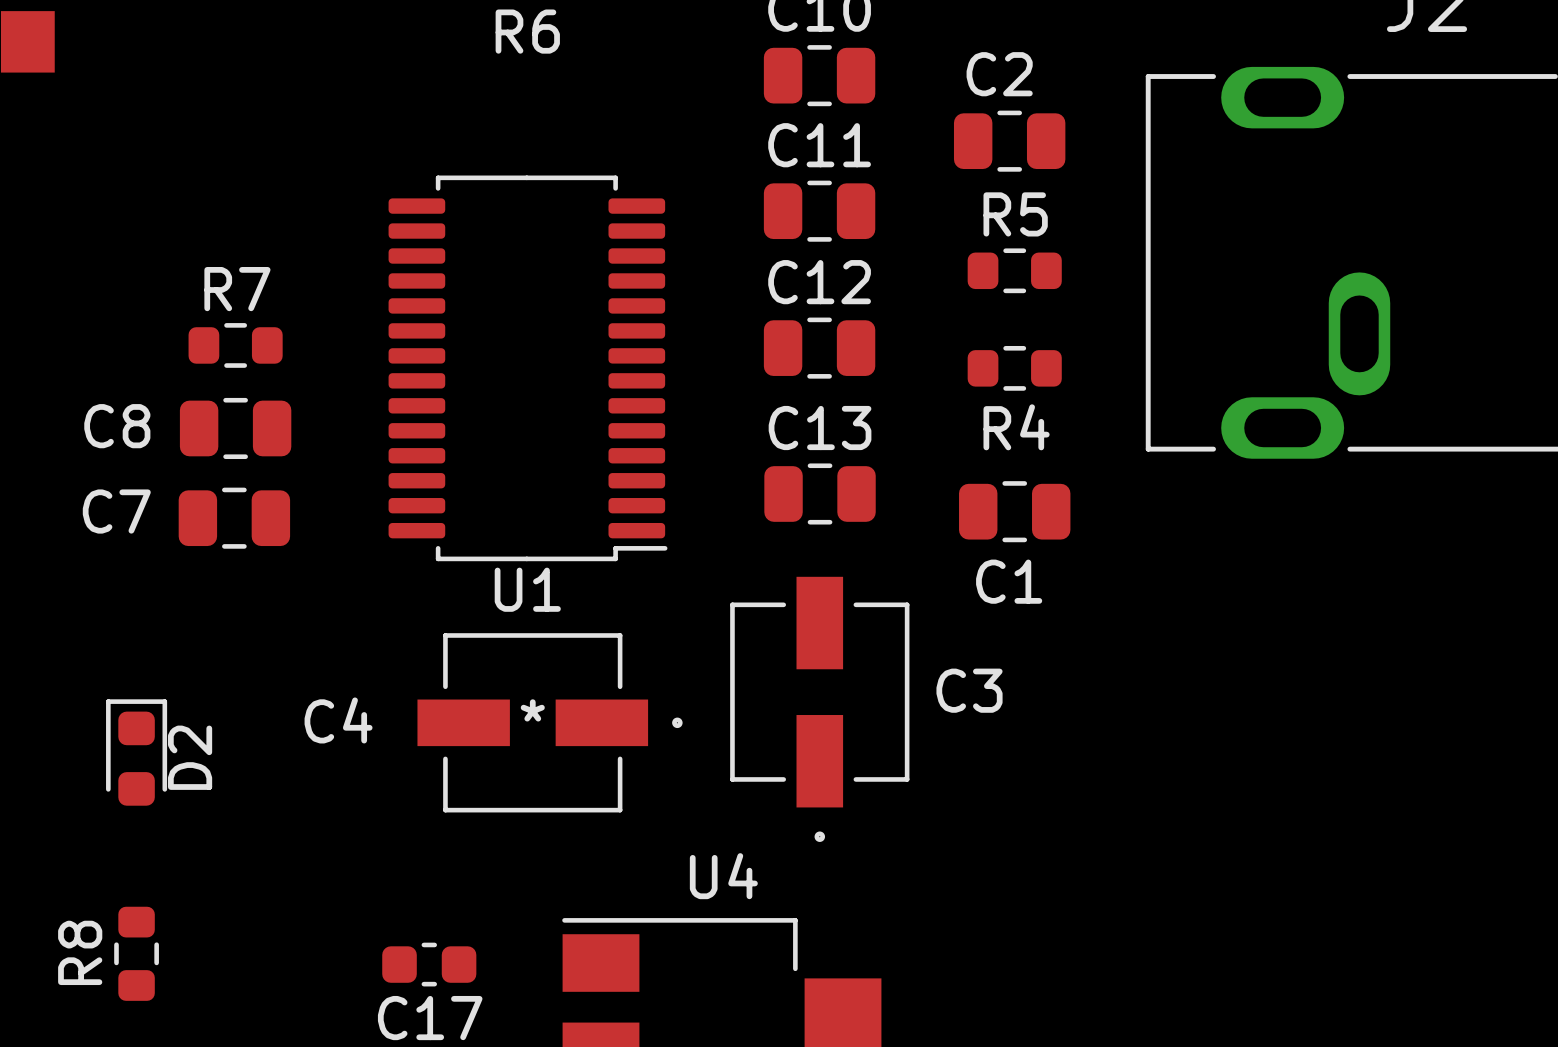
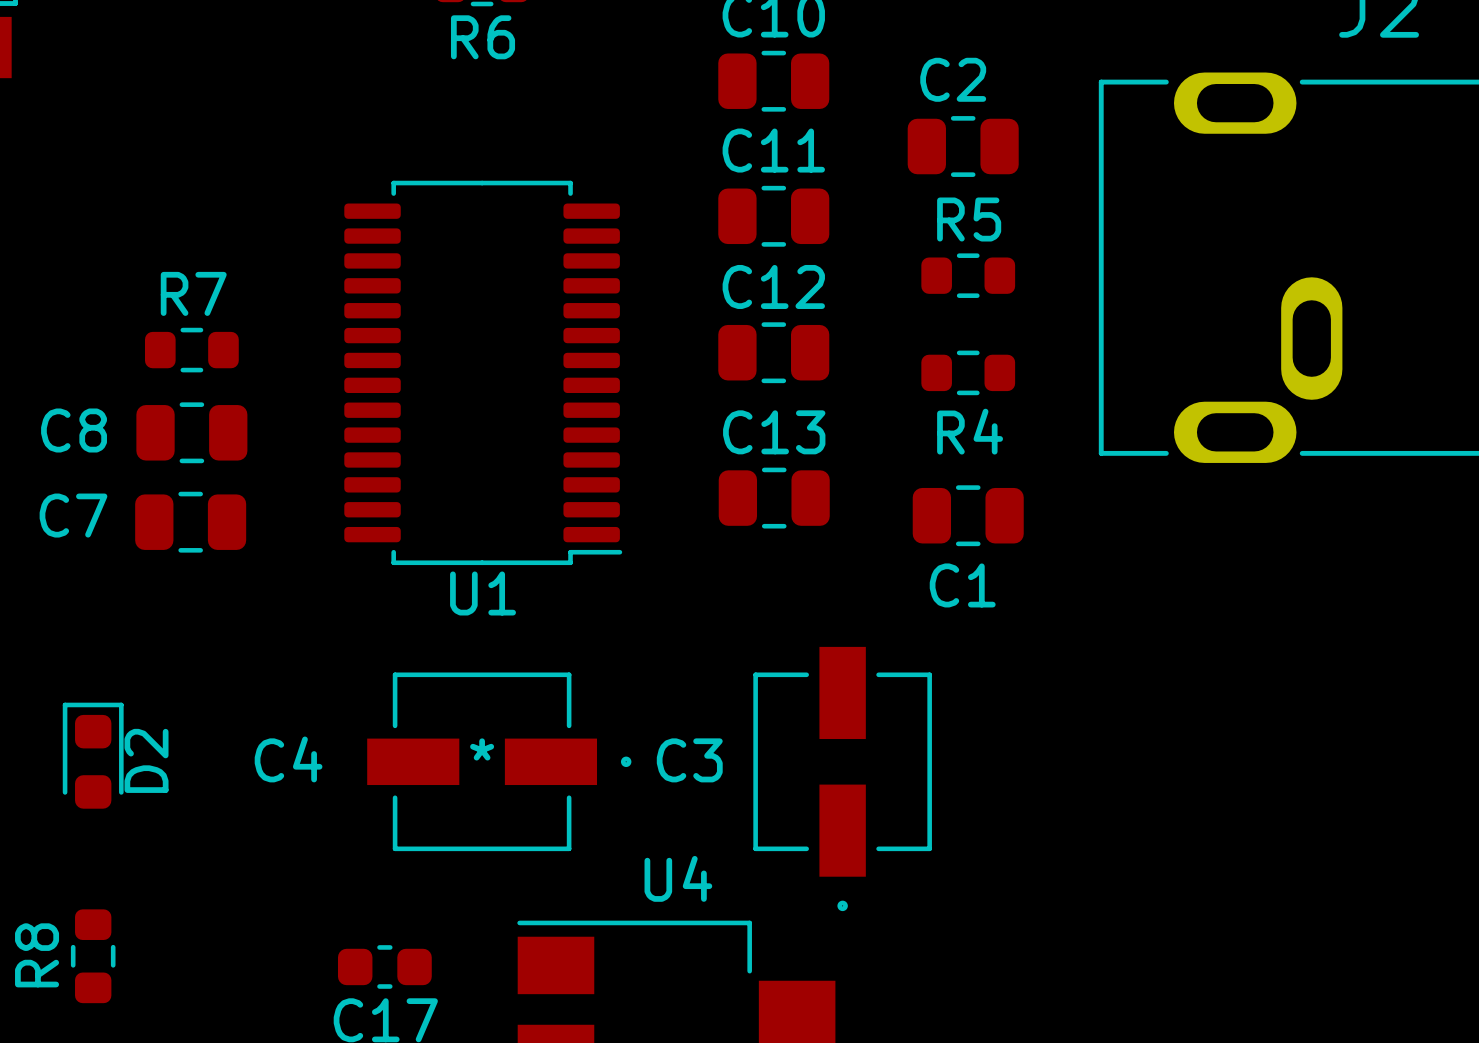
C3 name position: C3 (969, 690) -> C3 (689, 760)
C3 position: (819, 709) -> (842, 778)
C4 position: (550, 722) -> (499, 761)

